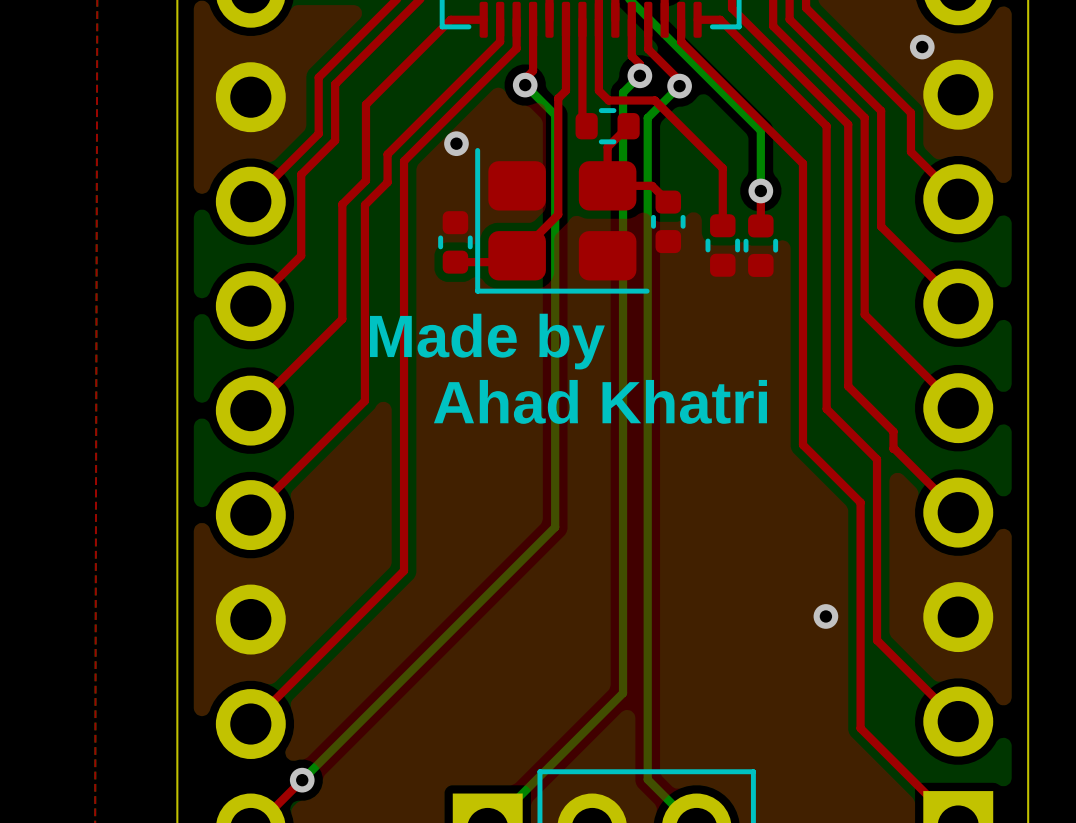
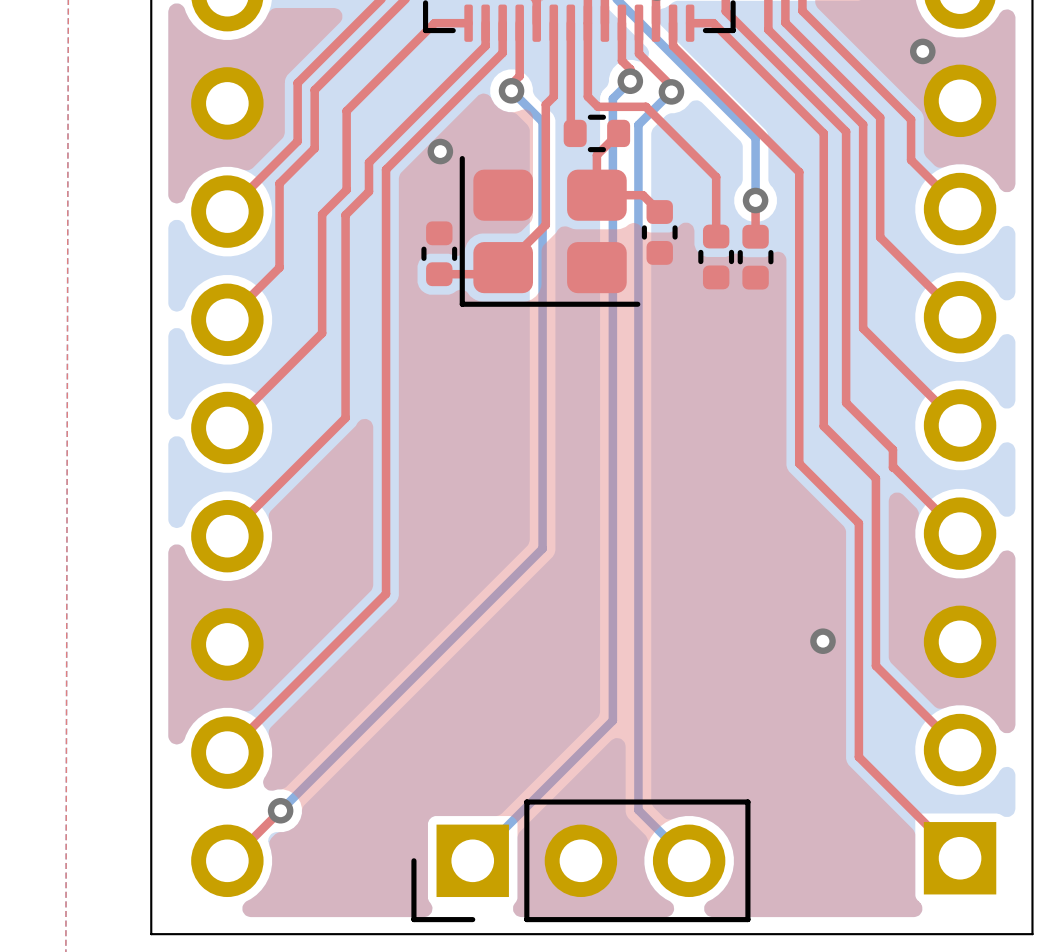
text: Made by (487, 341) -> none
text: Ahad Khatri (600, 401) -> none

